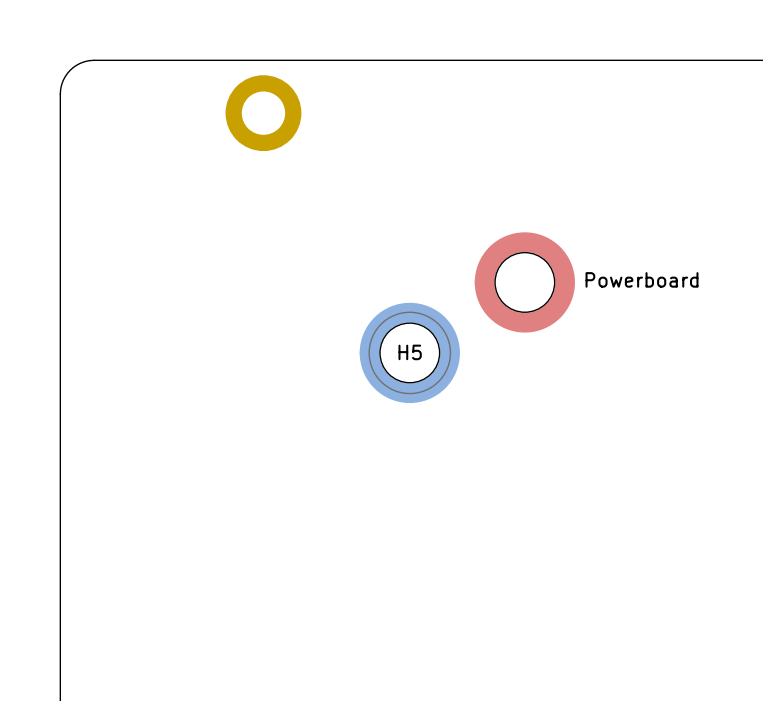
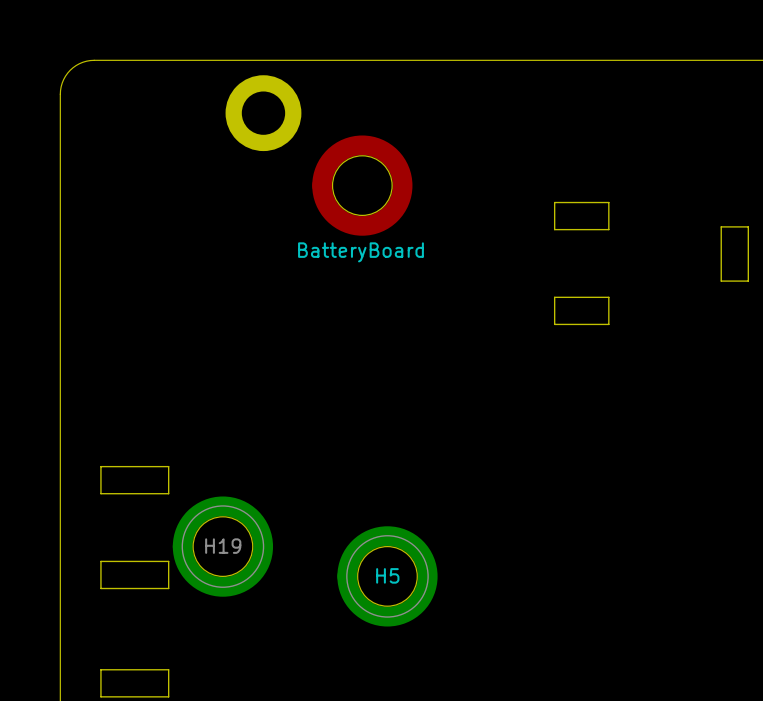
part: none -> (362, 185)
board edge: none -> (608, 202) (554, 202) (554, 229) (608, 229) (608, 202)
board edge: none -> (748, 226) (721, 226) (721, 281) (748, 281) (748, 226)
part: (524, 282) -> none
board edge: none -> (608, 297) (608, 324) (554, 324) (554, 297) (608, 297)
H5 position: (409, 352) -> (387, 576)
board edge: none -> (168, 466) (100, 466) (100, 493) (168, 493) (168, 466)
H19: none -> (222, 546)
board edge: none -> (168, 561) (168, 588) (100, 588) (100, 561) (168, 561)
board edge: none -> (168, 669) (168, 696) (100, 696) (100, 669) (168, 669)

